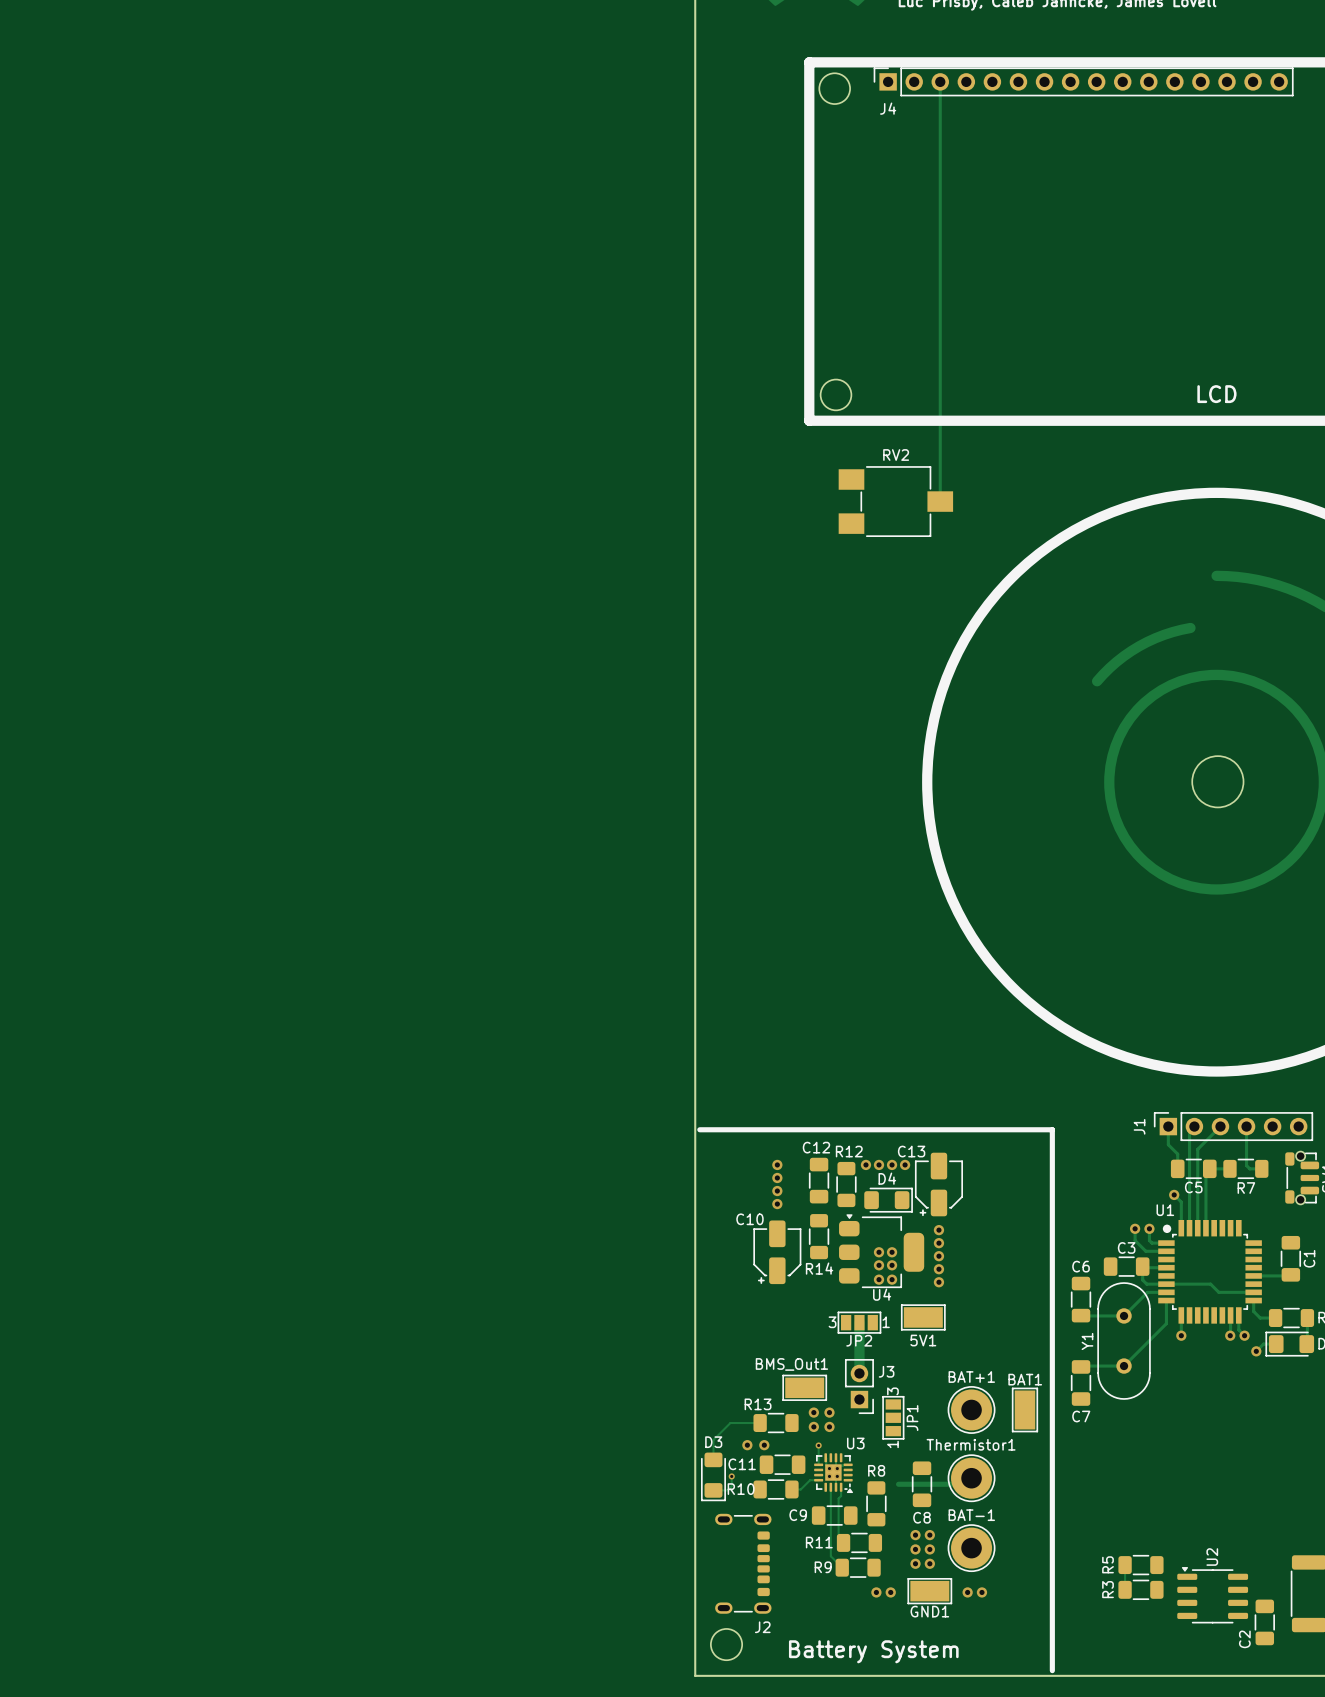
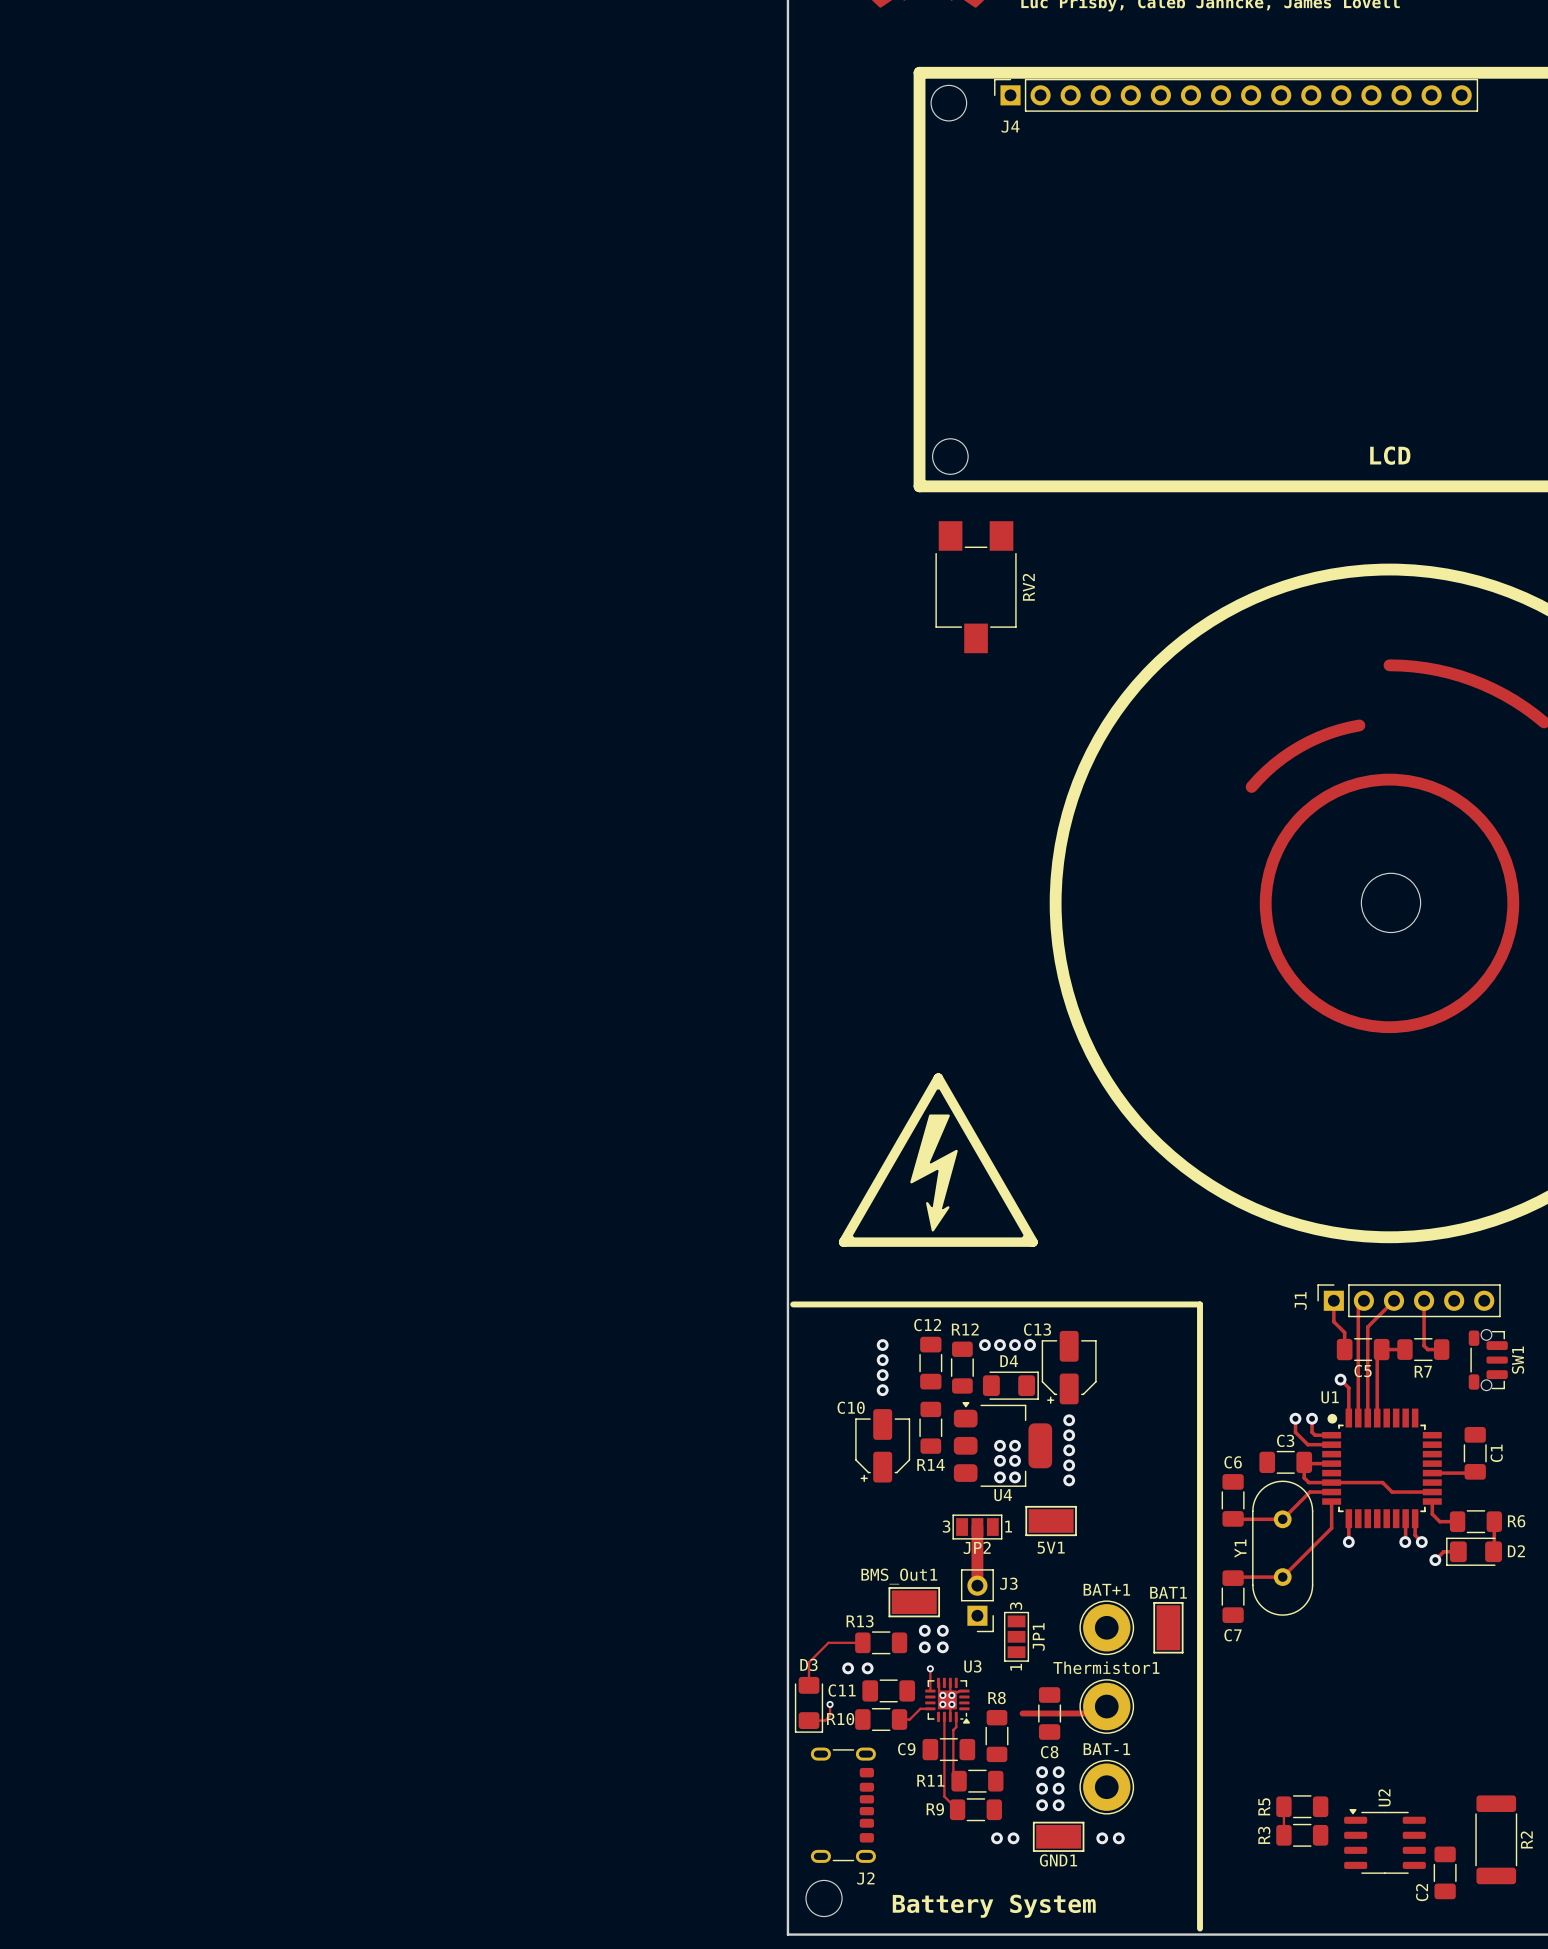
track: (940, 81) (940, 501) -> none
RV2 rotation: 0° (895, 501) -> 90° clockwise (976, 587)
drawing: none -> [838, 1073, 1038, 1247]

